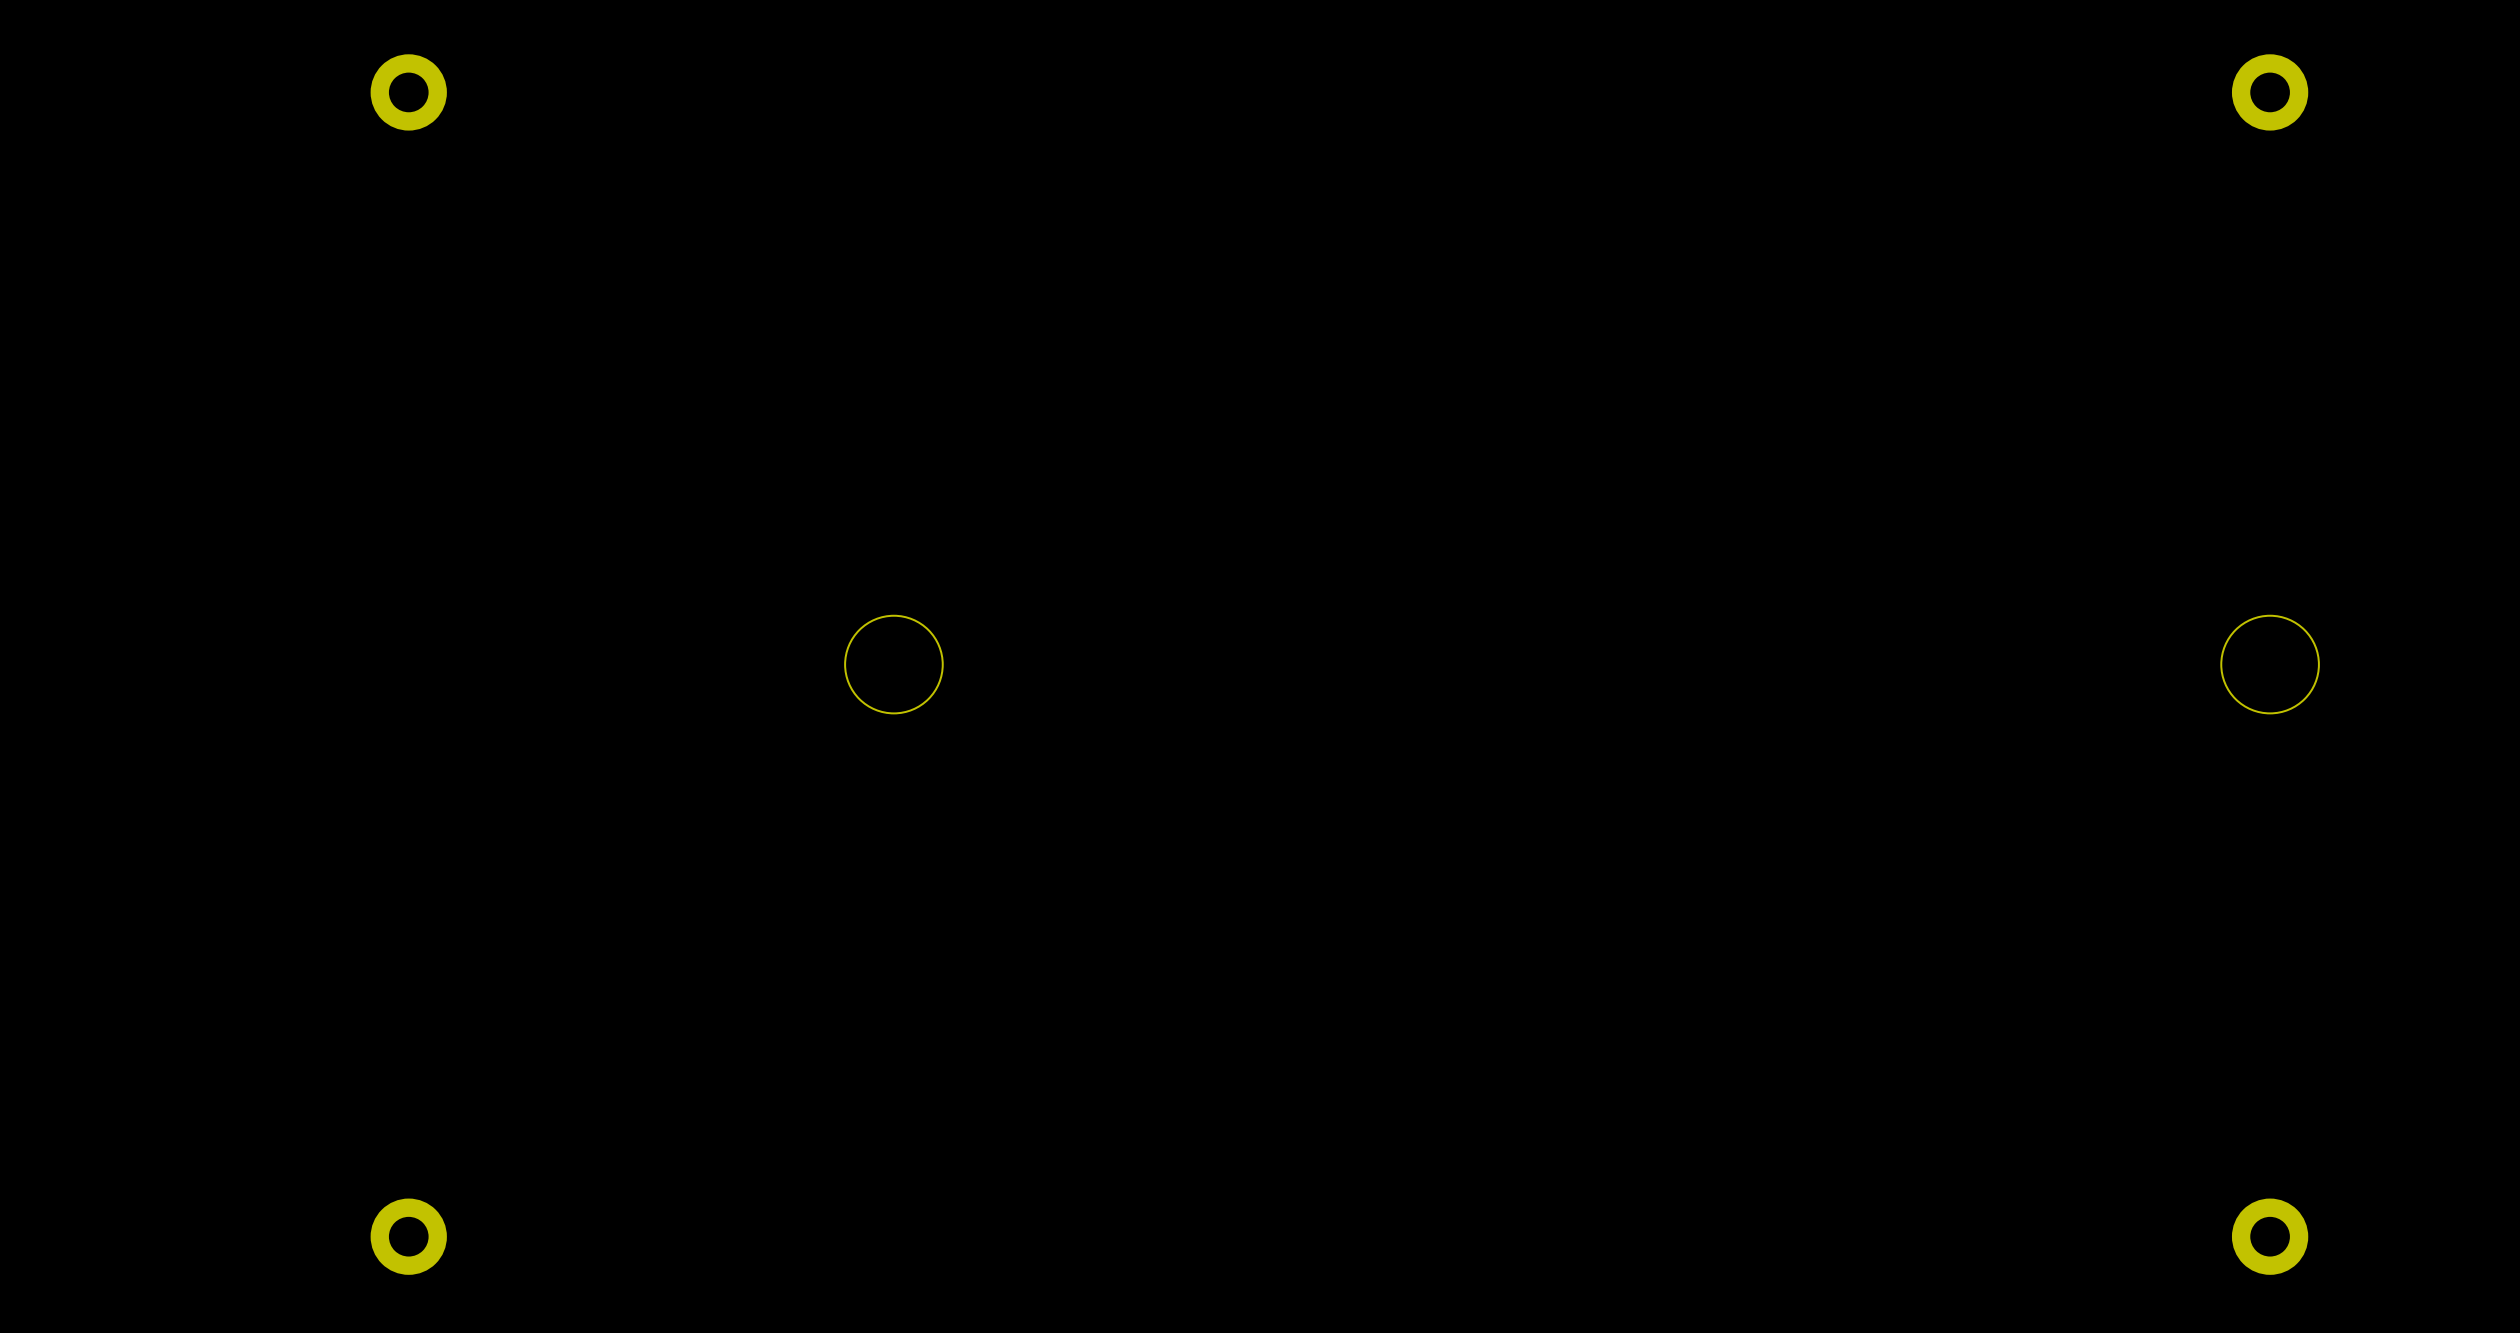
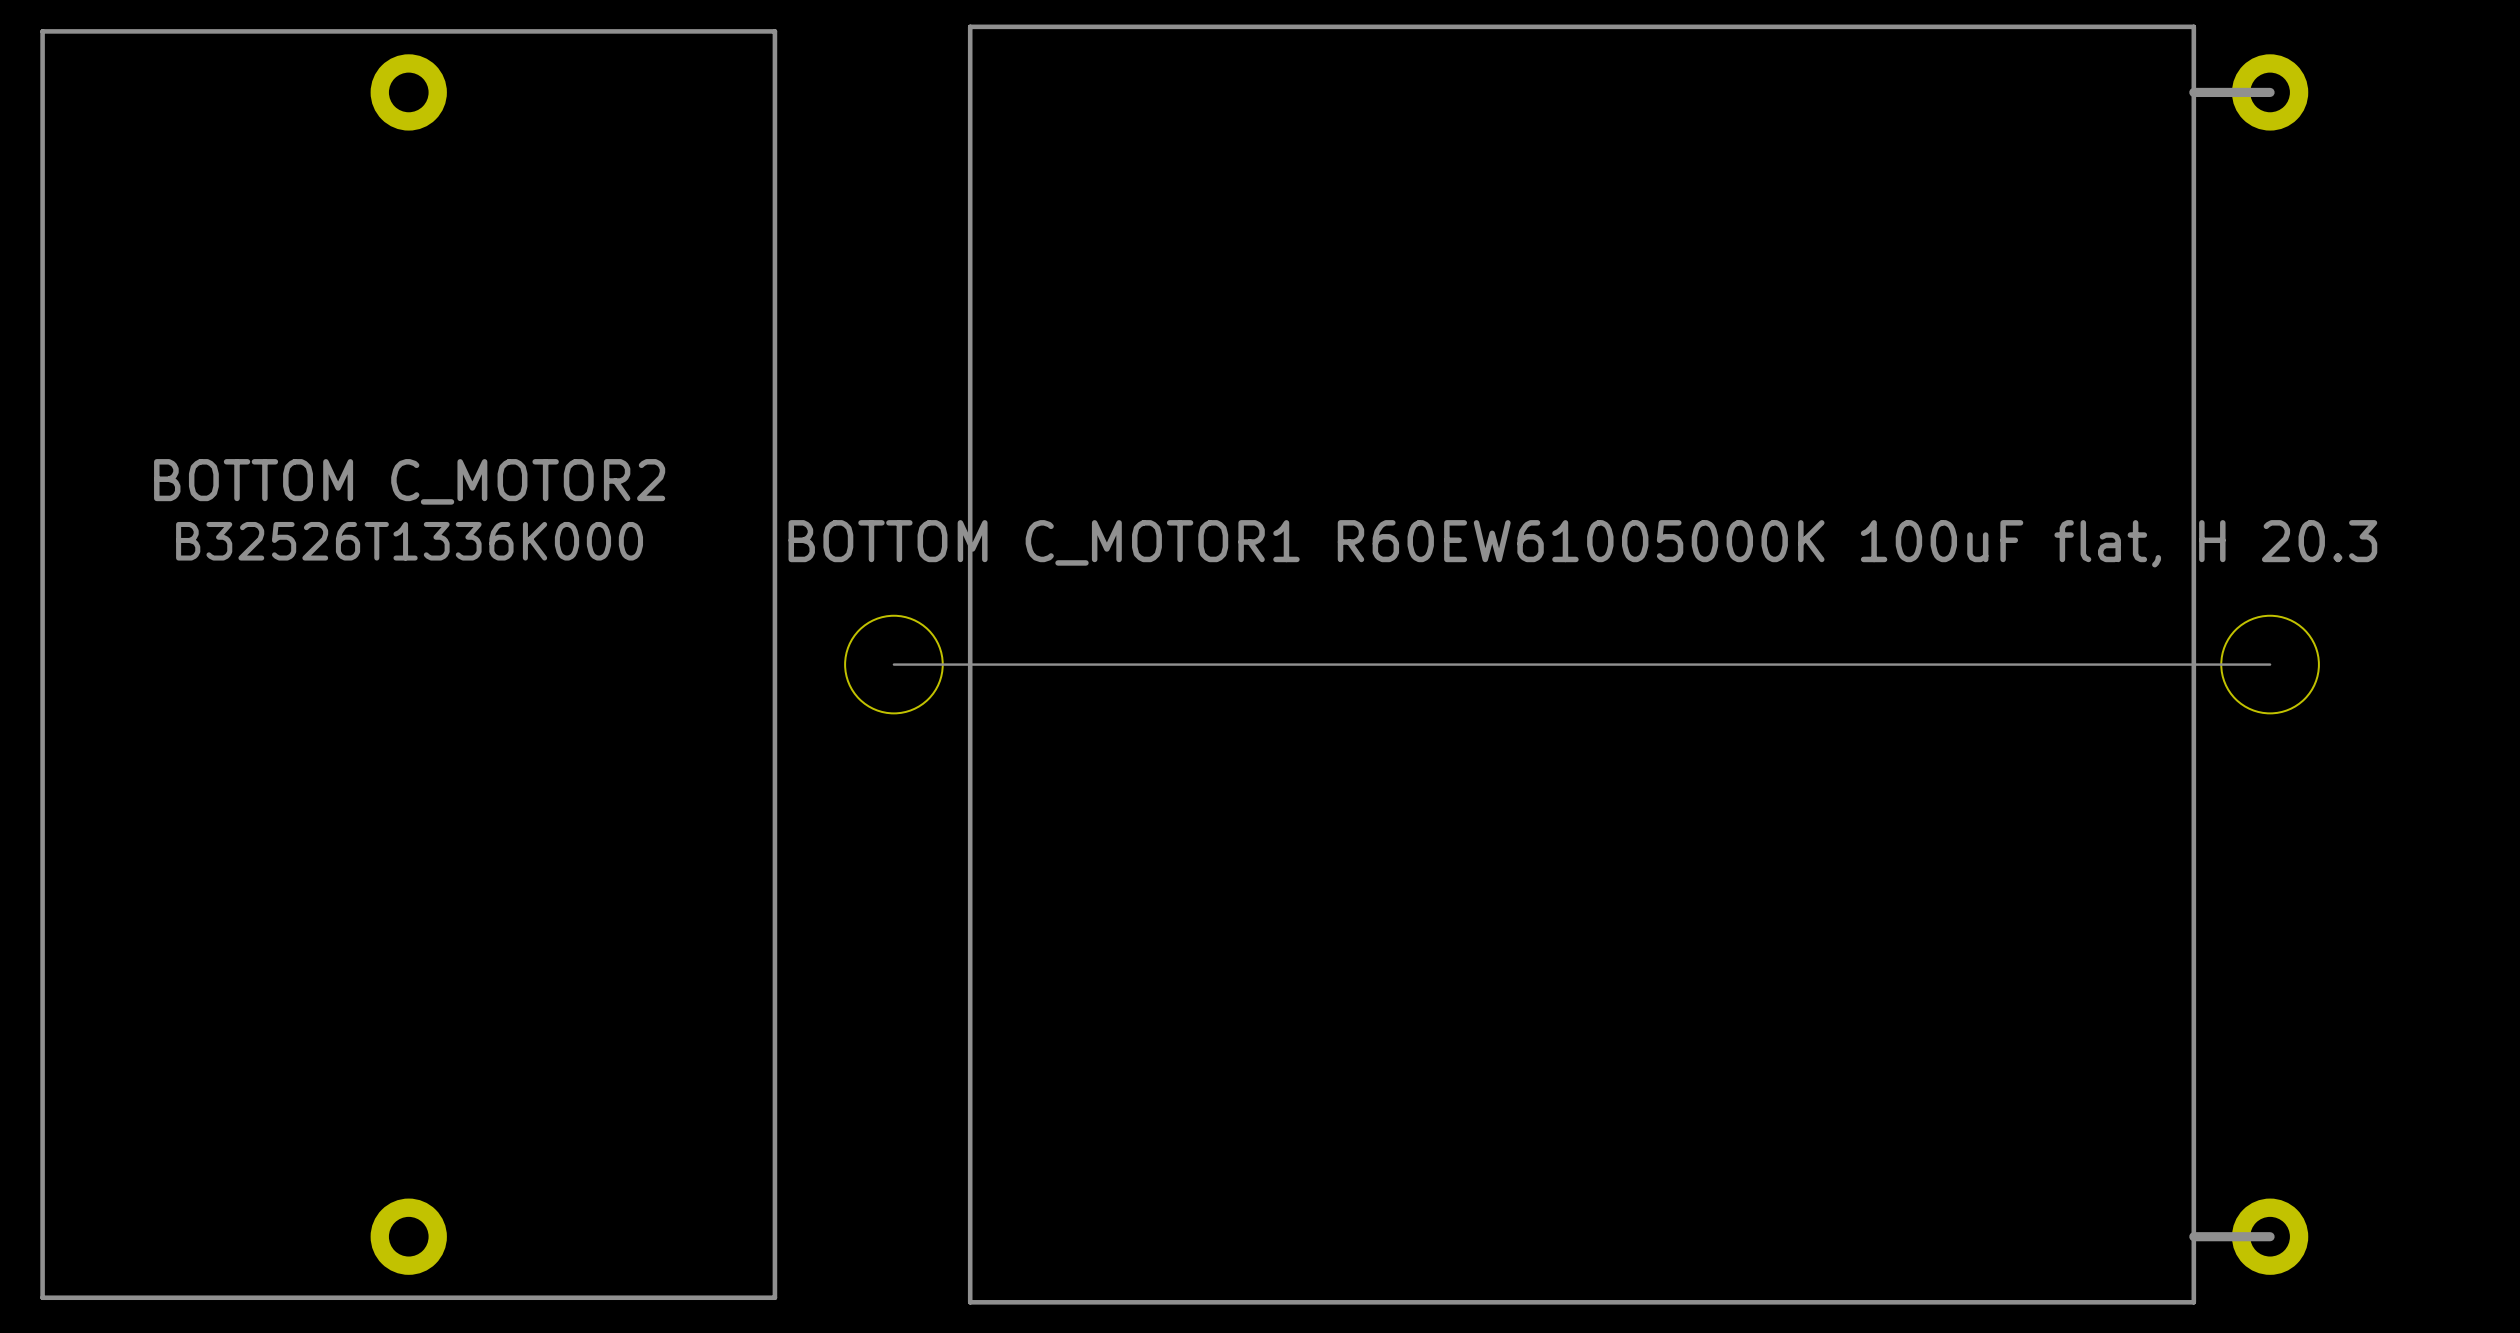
line: none -> (2193, 26) (970, 26) (970, 1302) (2193, 1302) (2193, 26)
line: none -> (774, 31) (42, 31) (42, 1297) (774, 1297) (774, 31)
line: none -> (2270, 92) (2193, 92)
text: none -> BOTTOM C_MOTOR2 (409, 481)
text: none -> B32526T1336K000 (409, 541)
text: none -> BOTTOM C_MOTOR1 R60EW61005000K 100uF flat, H 20.3 (1582, 543)
line: none -> (2270, 664) (893, 664)
line: none -> (2270, 1236) (2193, 1236)

